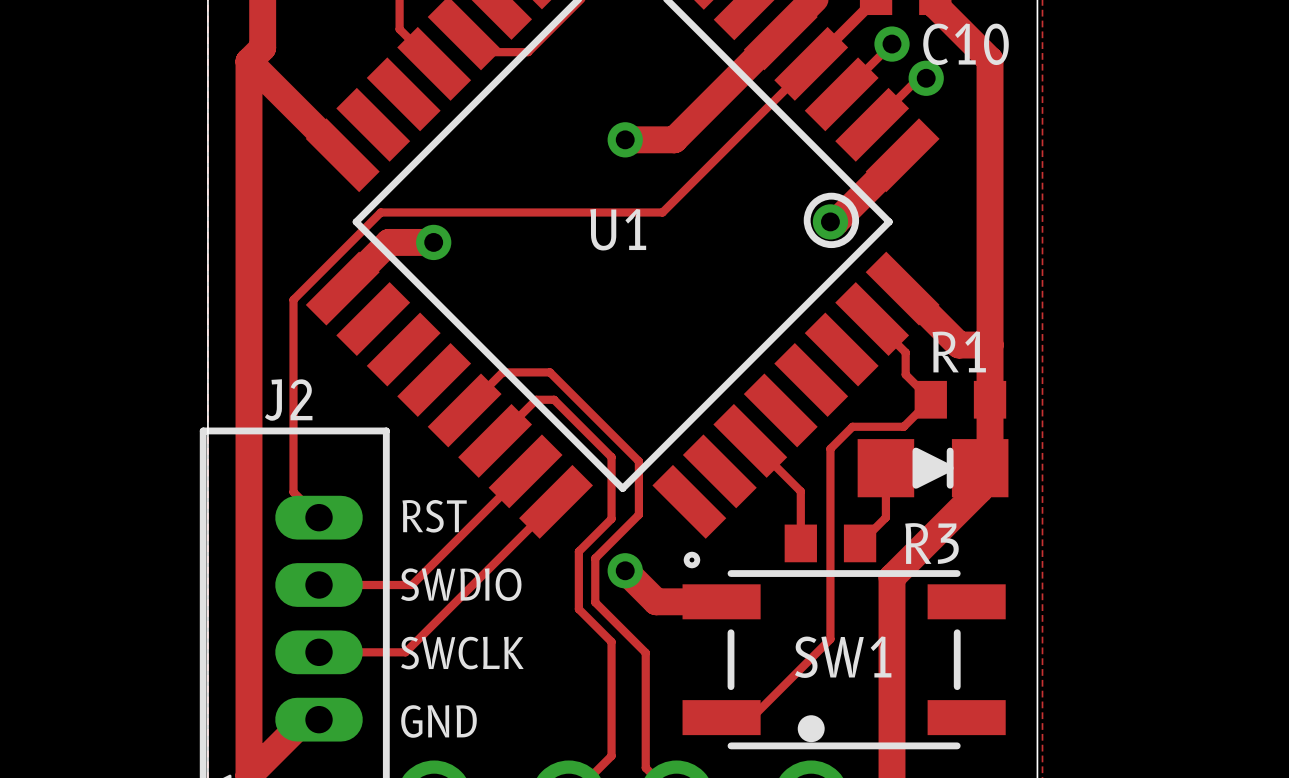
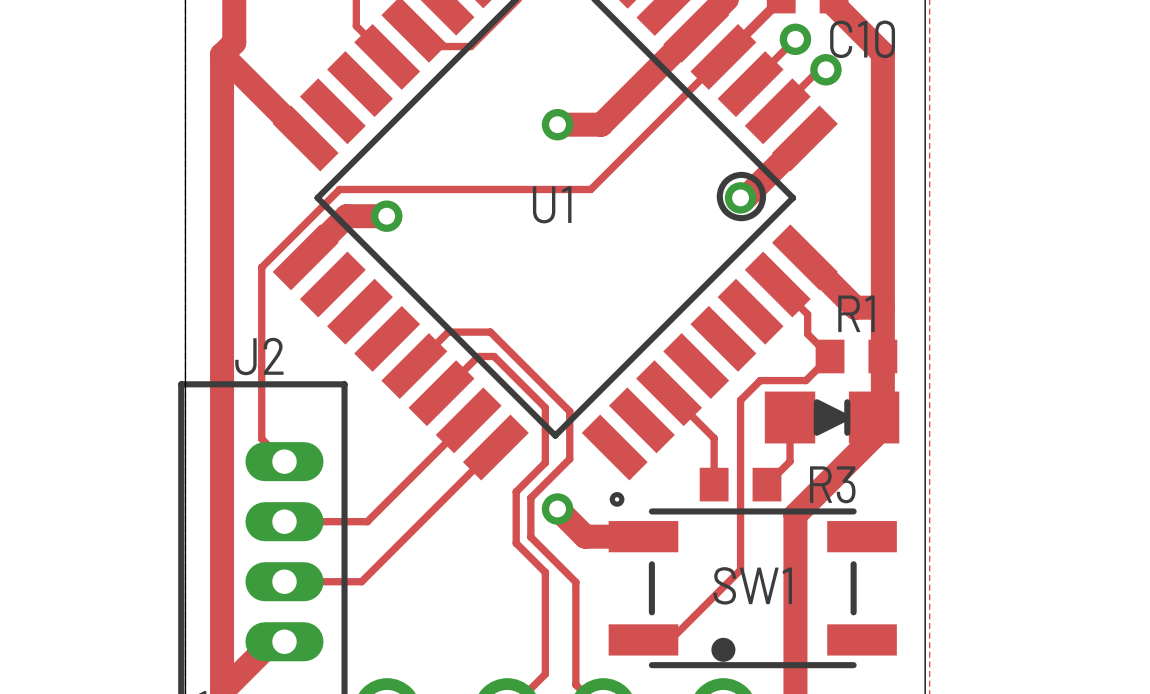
text: RST (434, 516) -> none
text: SWDIO (461, 584) -> none
text: SWCLK (462, 653) -> none
text: GND (438, 721) -> none

